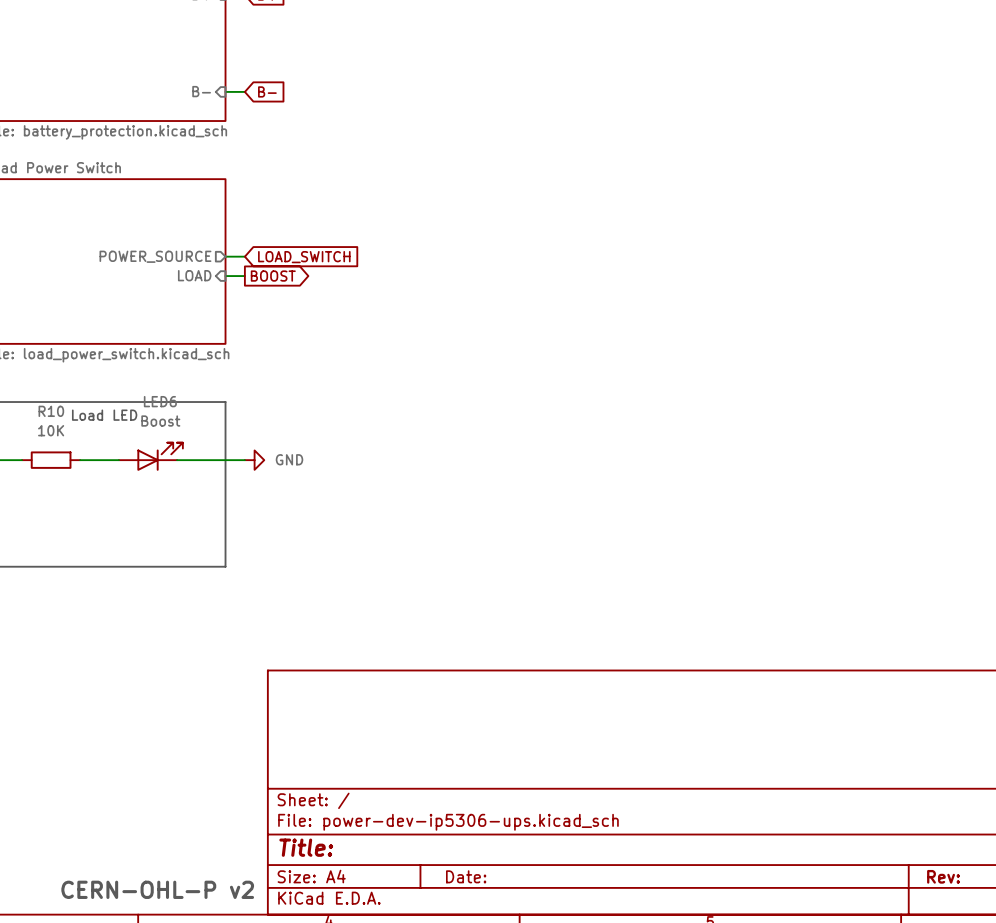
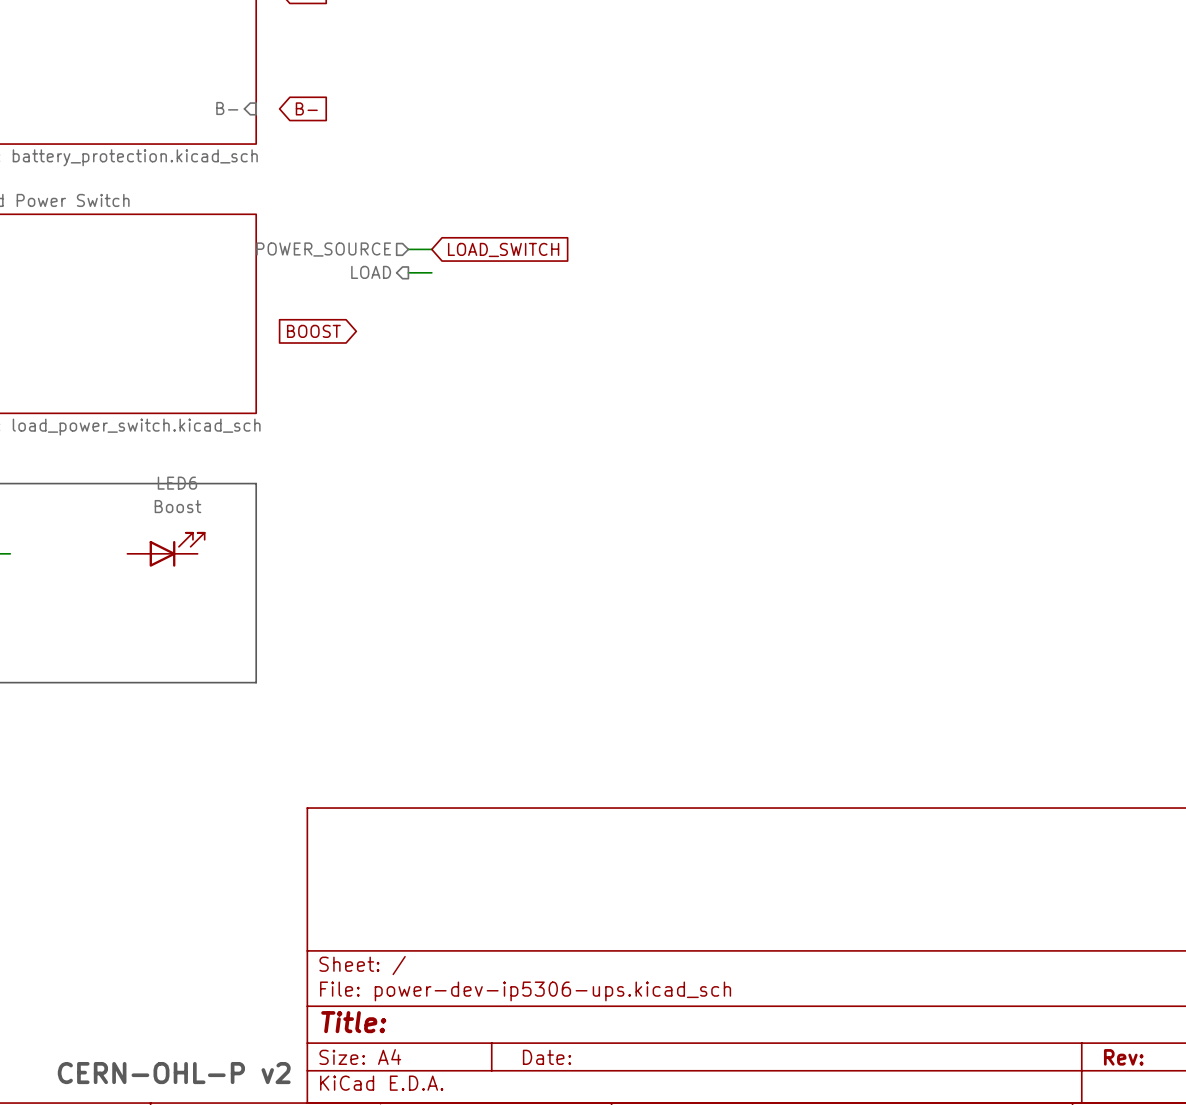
wire: (225, 91) (244, 91) -> none
sheet pin position: POWER_SOURCE (155, 256) -> POWER_SOURCE (323, 249)
wire: (225, 256) (244, 256) -> (408, 249) (431, 249)
global label position: LOAD_SWITCH (304, 257) -> LOAD_SWITCH (503, 249)
sheet pin position: LOAD (194, 275) -> LOAD (371, 272)
wire: (225, 276) (244, 276) -> (408, 272) (431, 272)
text: Load LED (104, 415) -> none
R10: 10K (51, 460) -> none
wire: (80, 460) (118, 460) -> none
wire: (177, 460) (244, 460) -> none
power symbol: GND (254, 460) -> none

